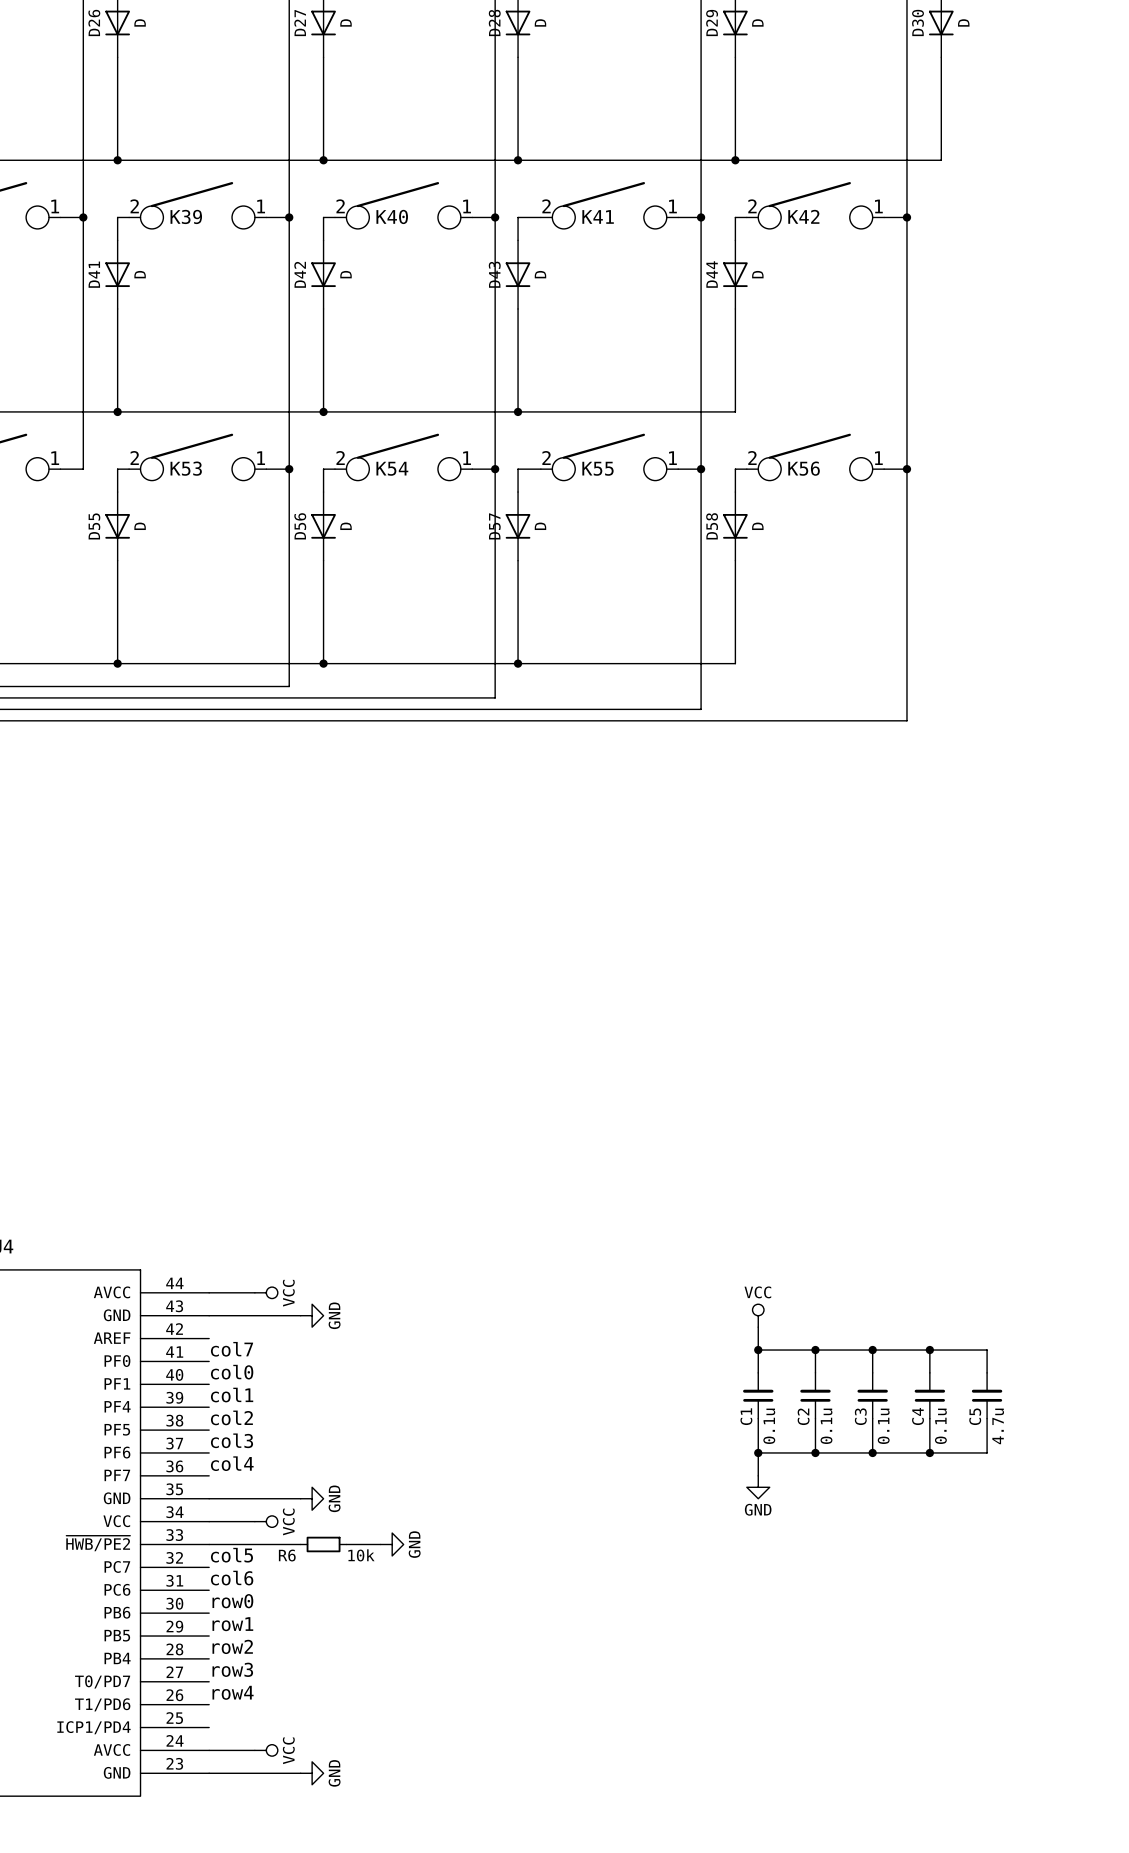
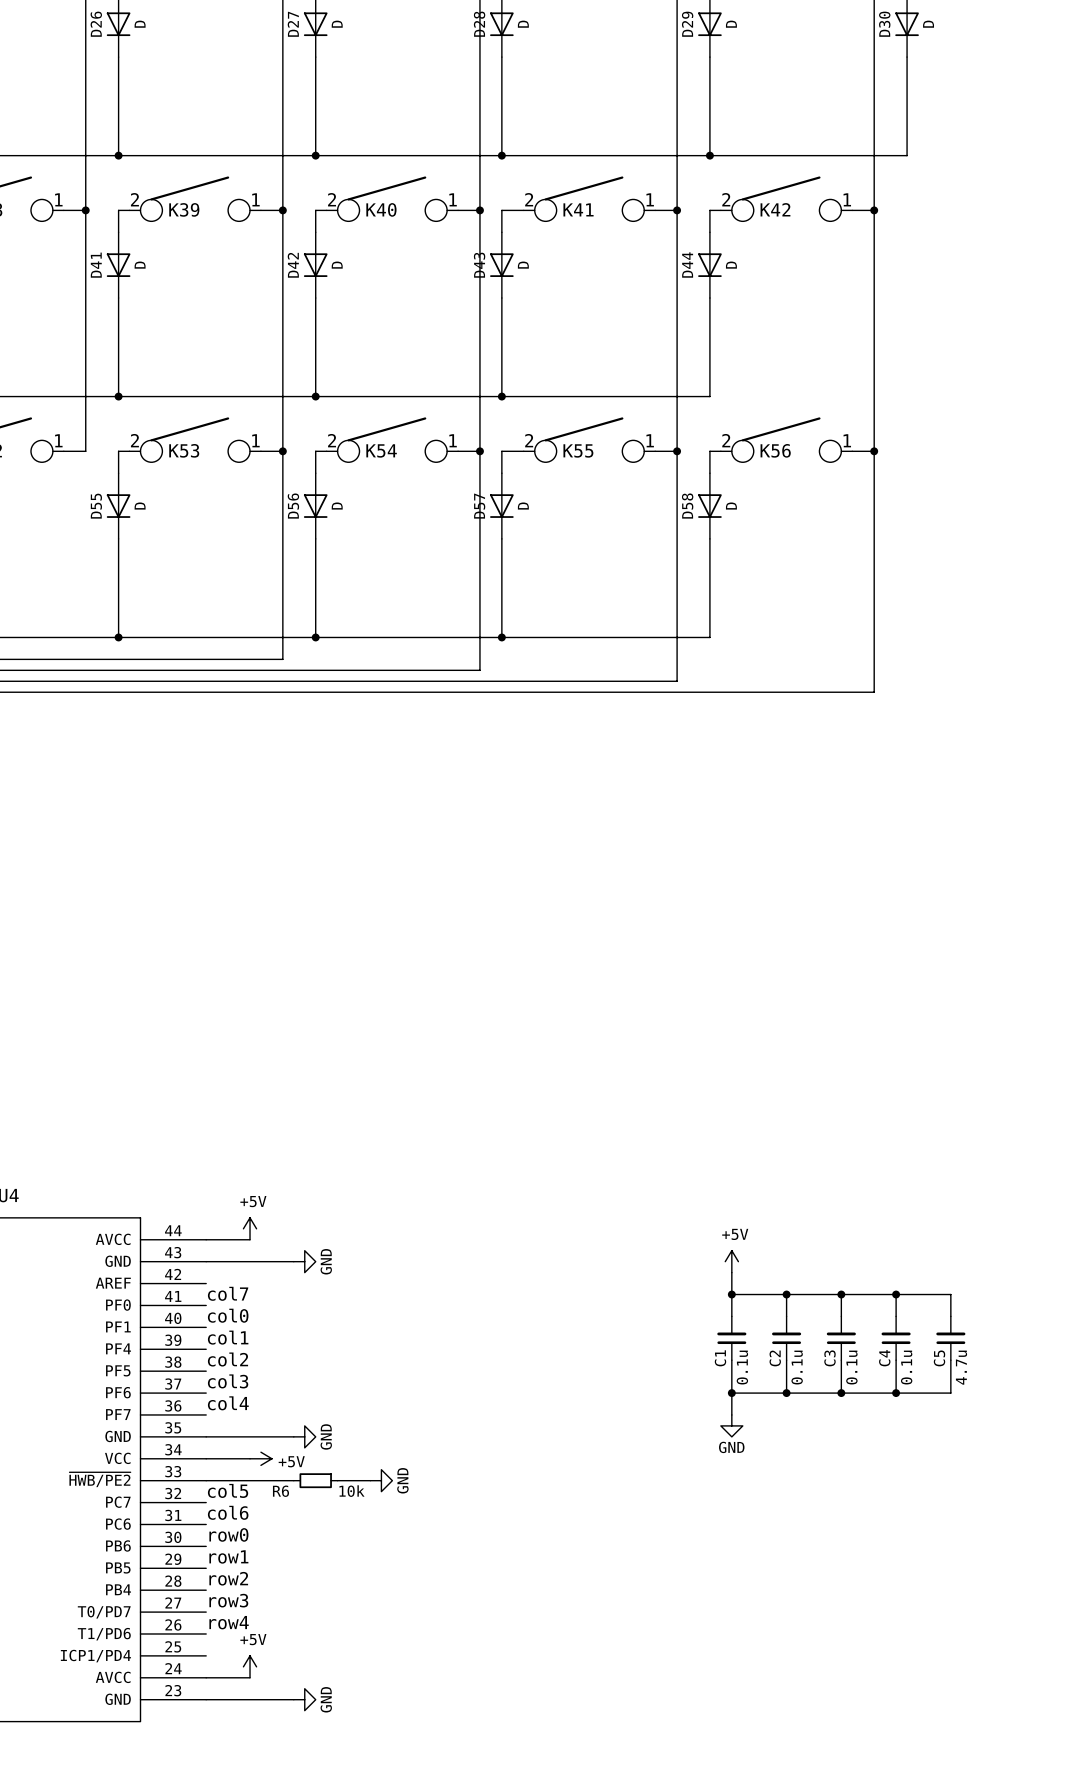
power symbol: none -> +5V (250, 1228)
power symbol: VCC (266, 1292) -> none
power symbol: VCC (758, 1315) -> +5V (731, 1261)
power symbol: VCC (266, 1521) -> +5V (260, 1458)
power symbol: none -> +5V (250, 1666)
power symbol: VCC (266, 1750) -> none

